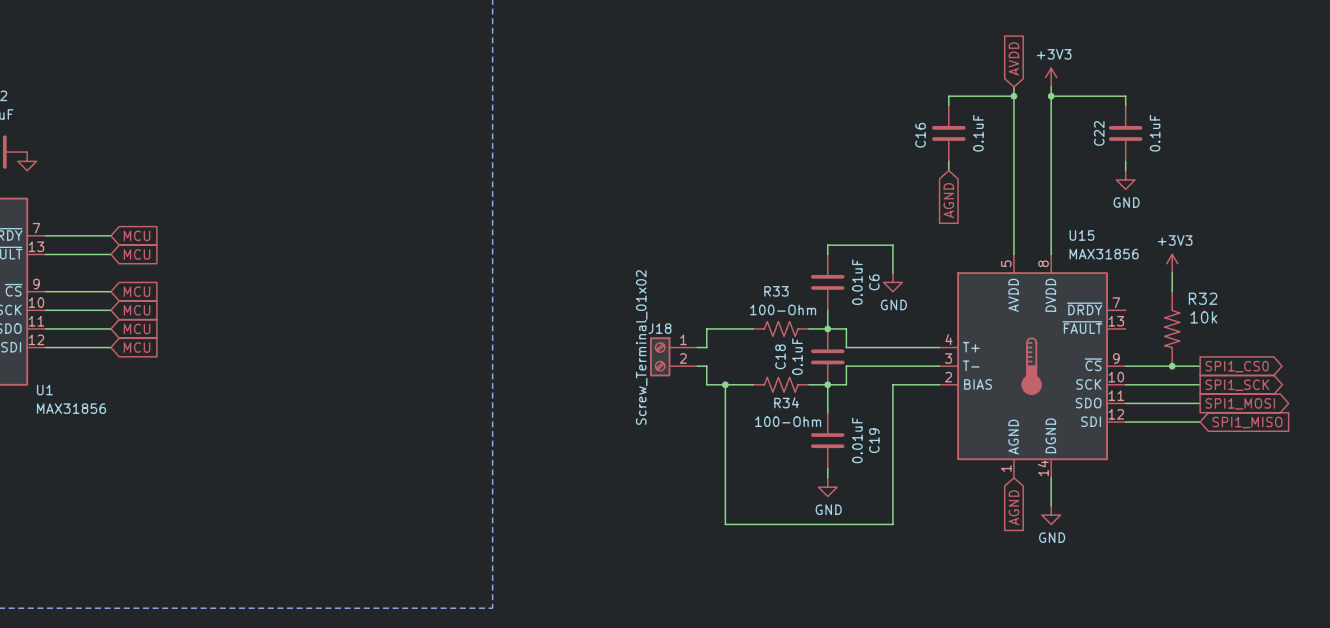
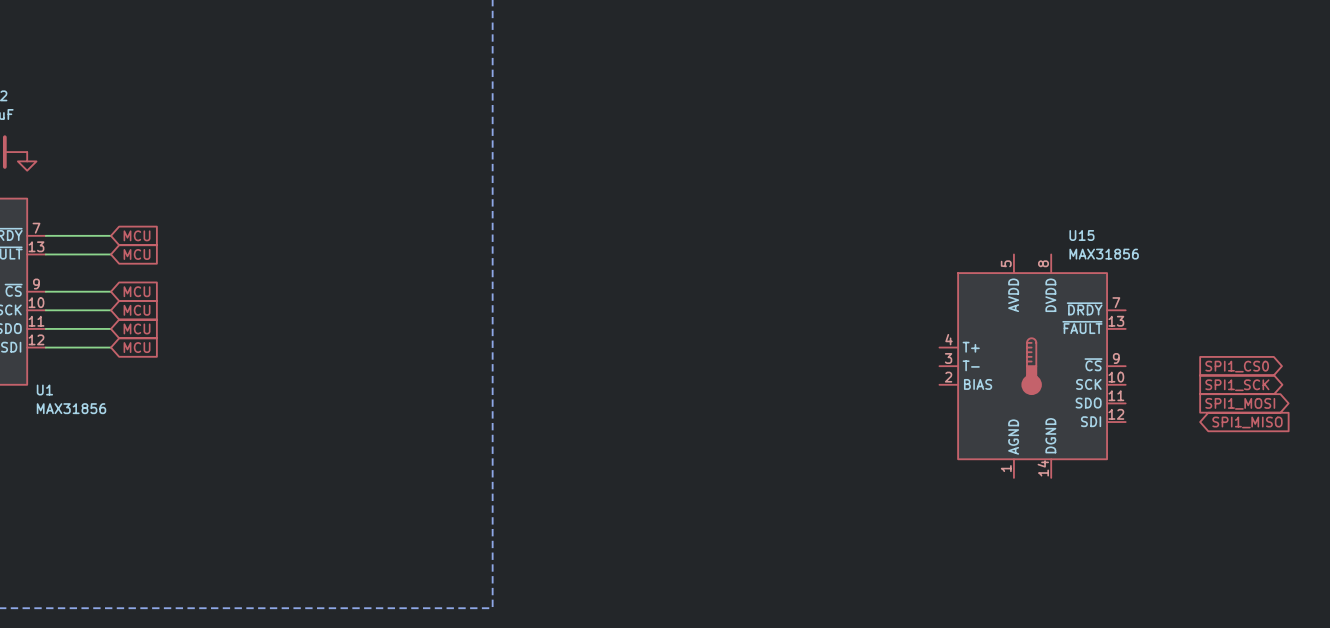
global label: AVDD (1013, 58) -> none
power symbol: +3V3 (1051, 77) -> none
wire: (1013, 86) (1013, 254) -> none
wire: (1051, 86) (1051, 254) -> none
wire: (1013, 96) (948, 96) (948, 105) -> none
junction: (1013, 96) -> none
wire: (1051, 96) (1125, 96) (1125, 105) -> none
junction: (1051, 96) -> none
C16: 0.1uF (948, 133) -> none
C22: 0.1uF (1125, 133) -> none
wire: (948, 161) (948, 170) -> none
wire: (1125, 161) (1125, 170) -> none
power symbol: GND (1125, 179) -> none
global label: AGND (948, 200) -> none
wire: (827, 254) (827, 245) (892, 245) (892, 273) -> none
power symbol: +3V3 (1172, 263) -> none
wire: (1172, 273) (1172, 291) -> none
C6: 0.01uF (827, 282) -> none
power symbol: GND (892, 282) -> none
wire: (827, 310) (827, 328) -> none
wire: (753, 328) (706, 328) (706, 347) (697, 347) -> none
R33: 100-Ohm (781, 328) -> none
wire: (809, 328) (846, 328) (846, 347) (939, 347) -> none
junction: (827, 328) -> none
R32: 10k (1172, 328) -> none
J18: Screw_Terminal_01x02 (673, 356) -> none
C18: 0.1uF (827, 356) -> none
wire: (697, 366) (706, 366) (706, 384) (753, 384) -> none
wire: (939, 366) (846, 366) (846, 384) (809, 384) -> none
wire: (1125, 366) (1200, 366) -> none
junction: (1172, 366) -> none
wire: (725, 384) (725, 524) (892, 524) (892, 384) (939, 384) -> none
junction: (725, 384) -> none
R34: 100-Ohm (781, 384) -> none
wire: (827, 384) (827, 412) -> none
junction: (827, 384) -> none
wire: (1125, 384) (1200, 384) -> none
wire: (1125, 403) (1200, 403) -> none
wire: (1125, 422) (1200, 422) -> none
C19: 0.01uF (827, 440) -> none
wire: (827, 468) (827, 477) -> none
wire: (1051, 477) (1051, 505) -> none
power symbol: GND (827, 487) -> none
global label: AGND (1013, 507) -> none
power symbol: GND (1051, 515) -> none

